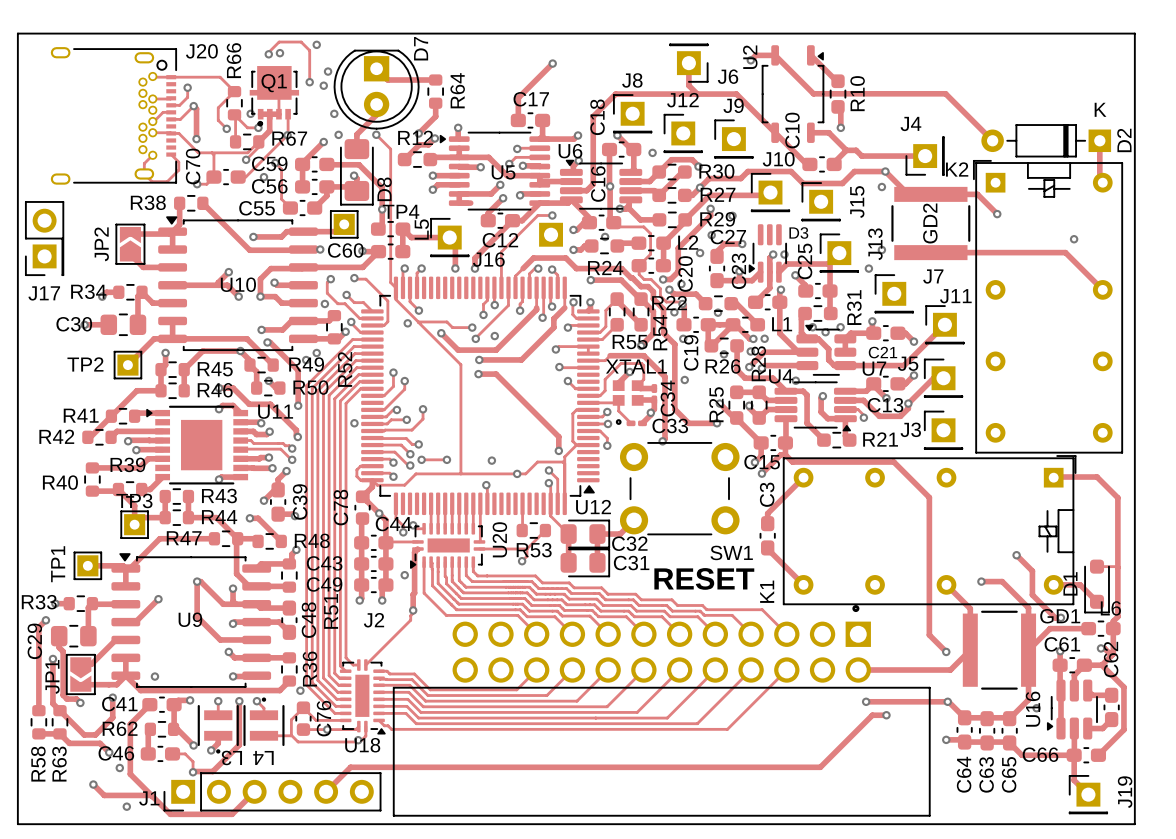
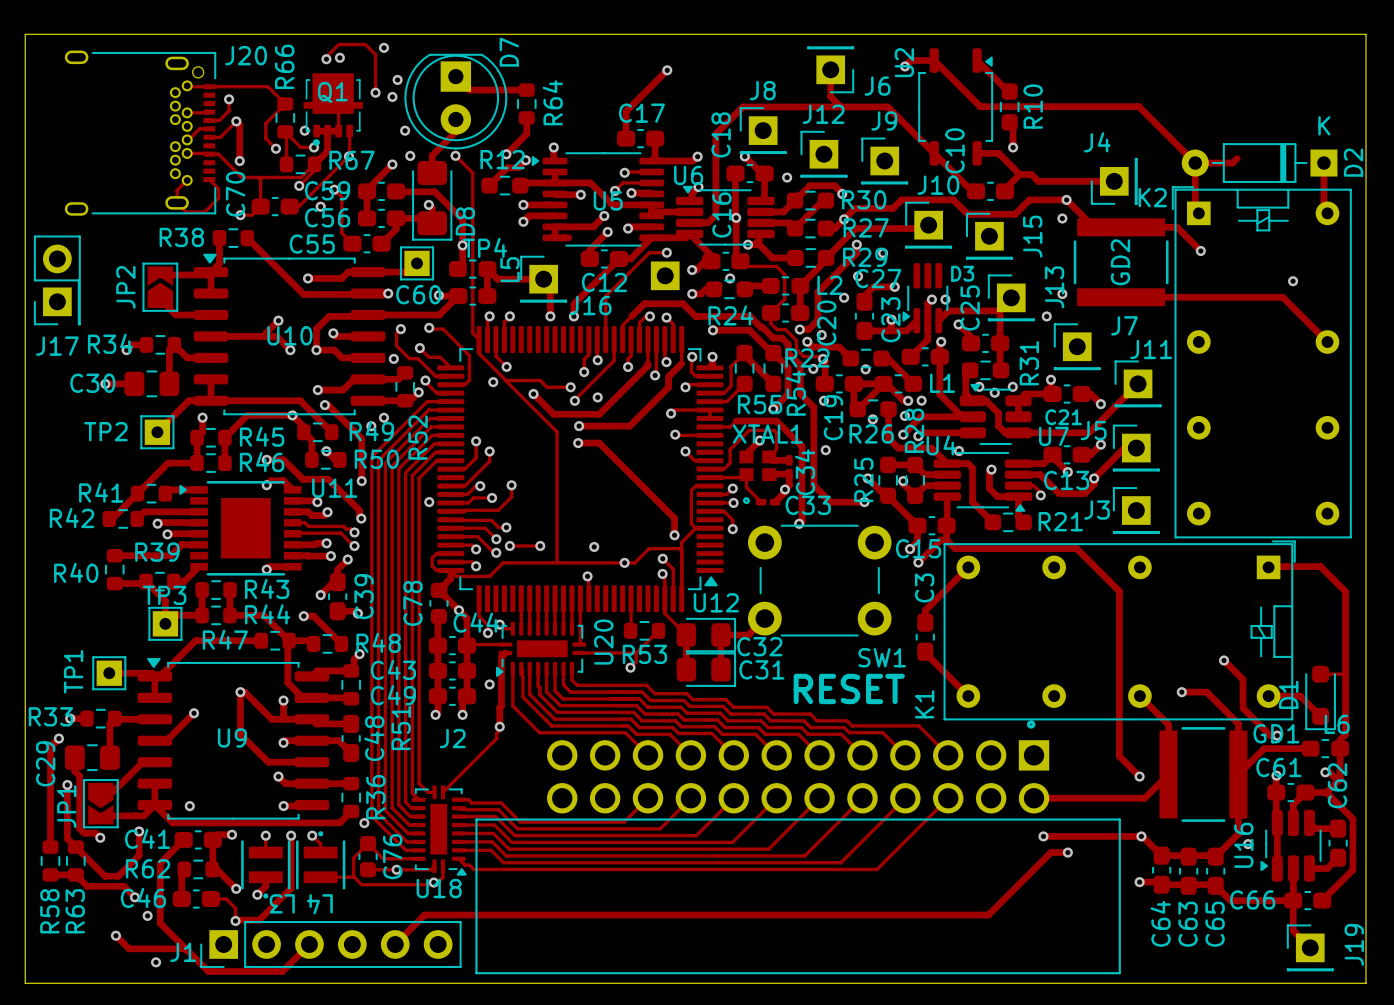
track: none -> (1237, 158) (1232, 163) (1195, 163) (1195, 209)

